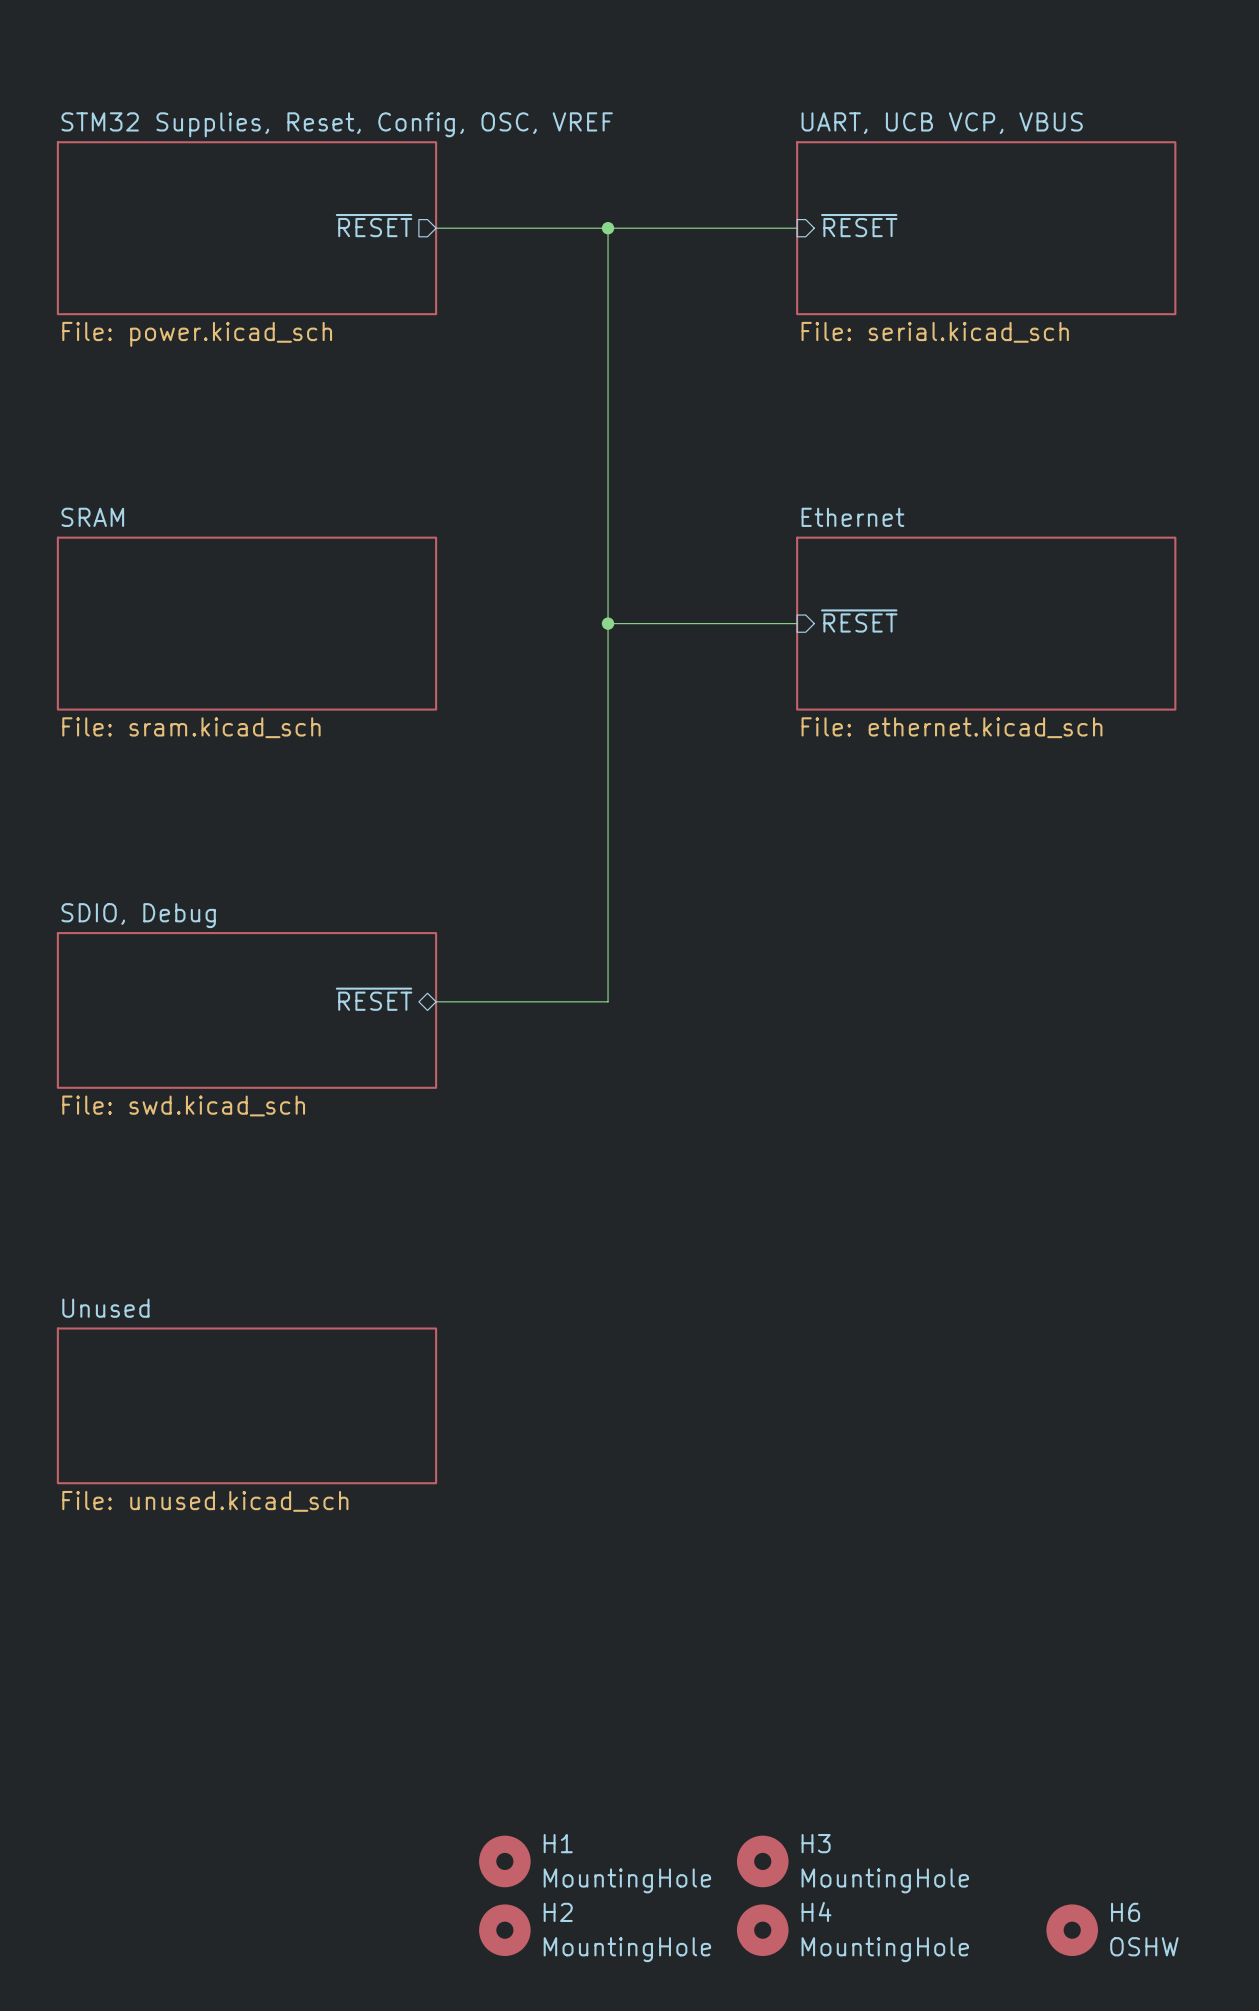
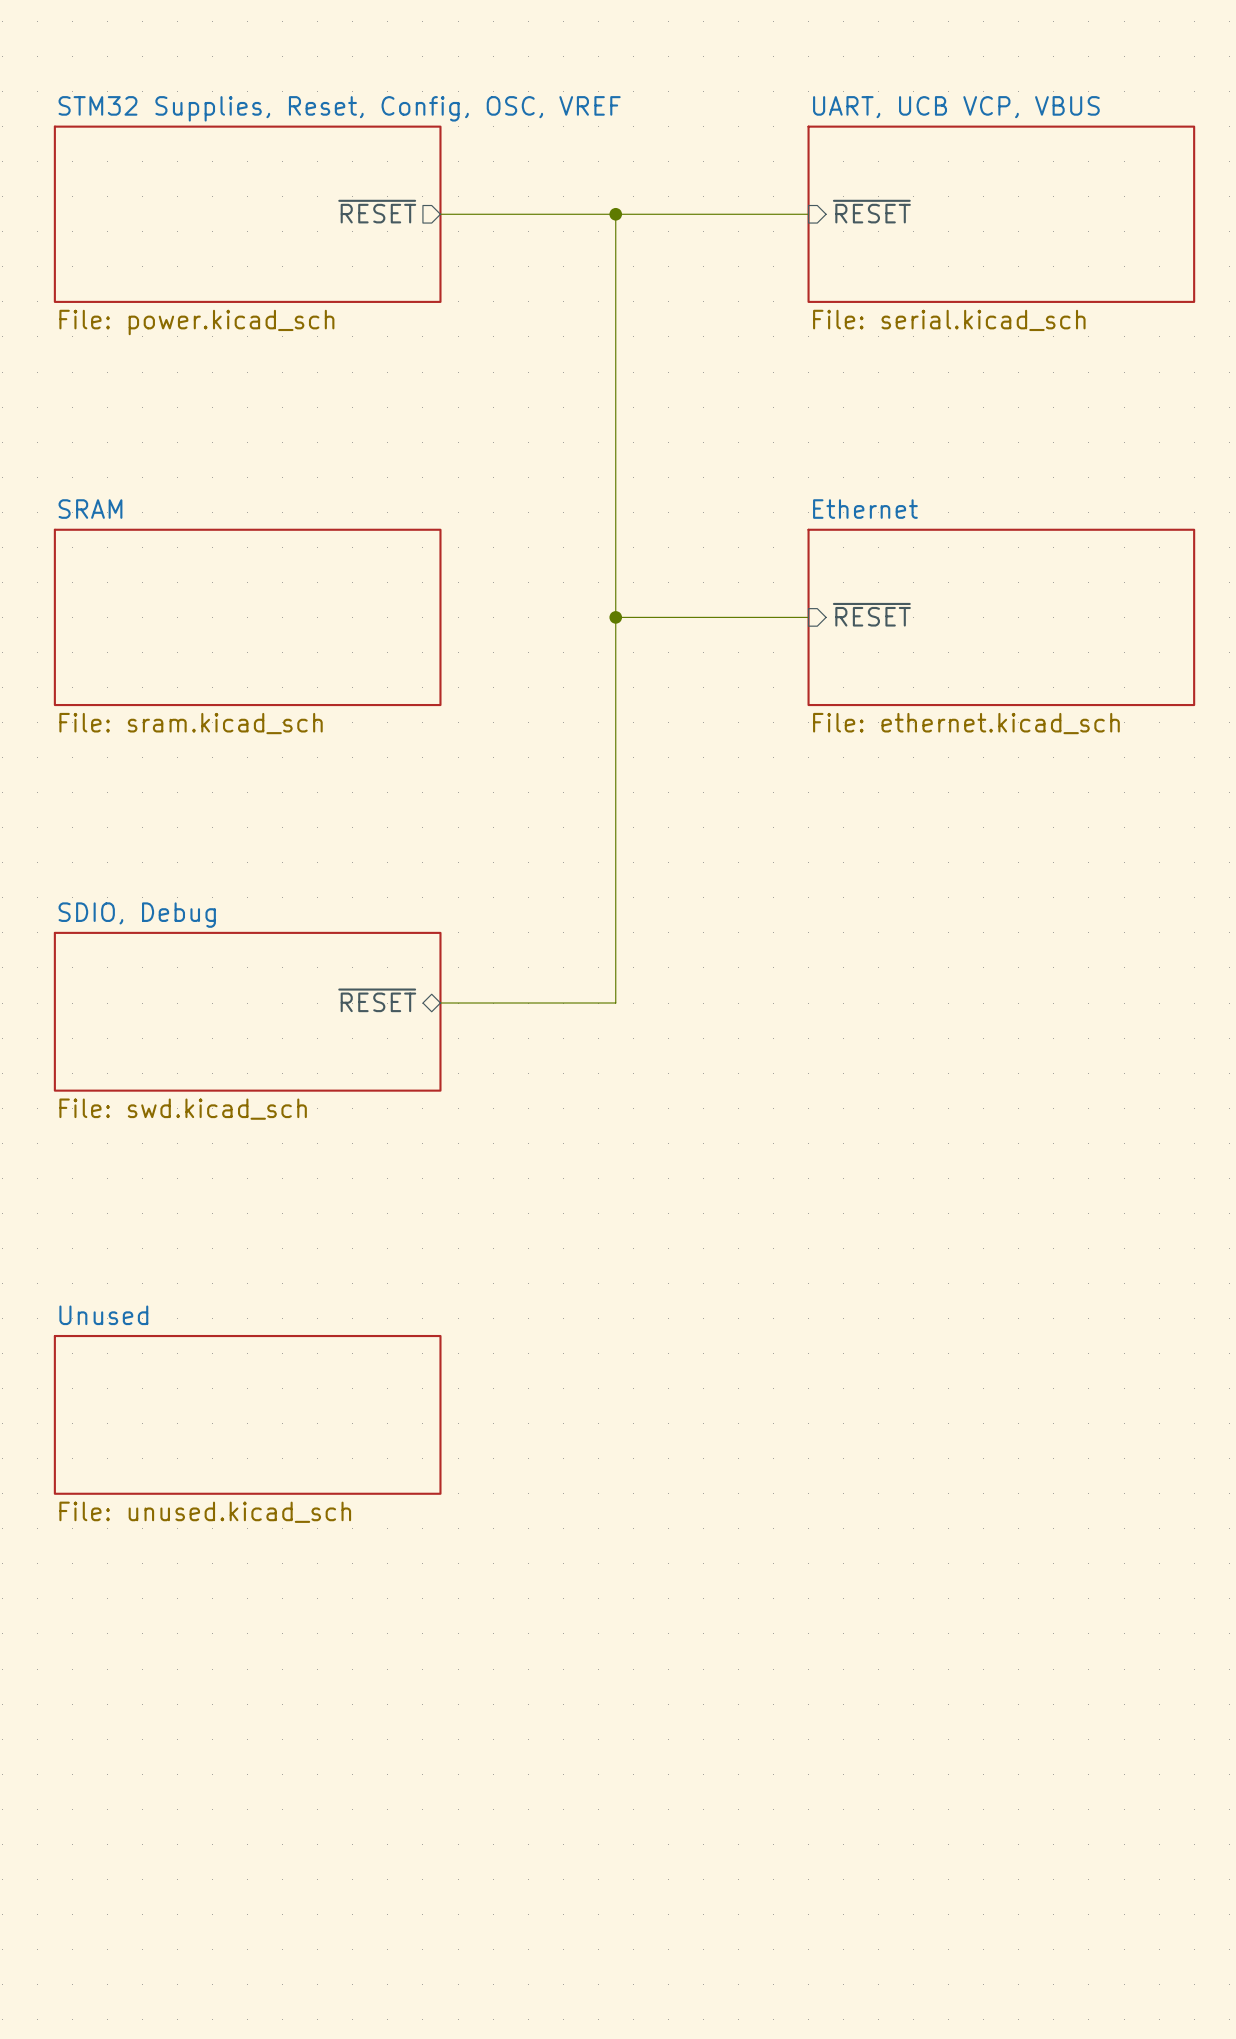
H1: MountingHole (504, 1861) -> none
H3: MountingHole (762, 1861) -> none
H2: MountingHole (504, 1930) -> none
H4: MountingHole (762, 1930) -> none
H6: OSHW (1072, 1930) -> none

